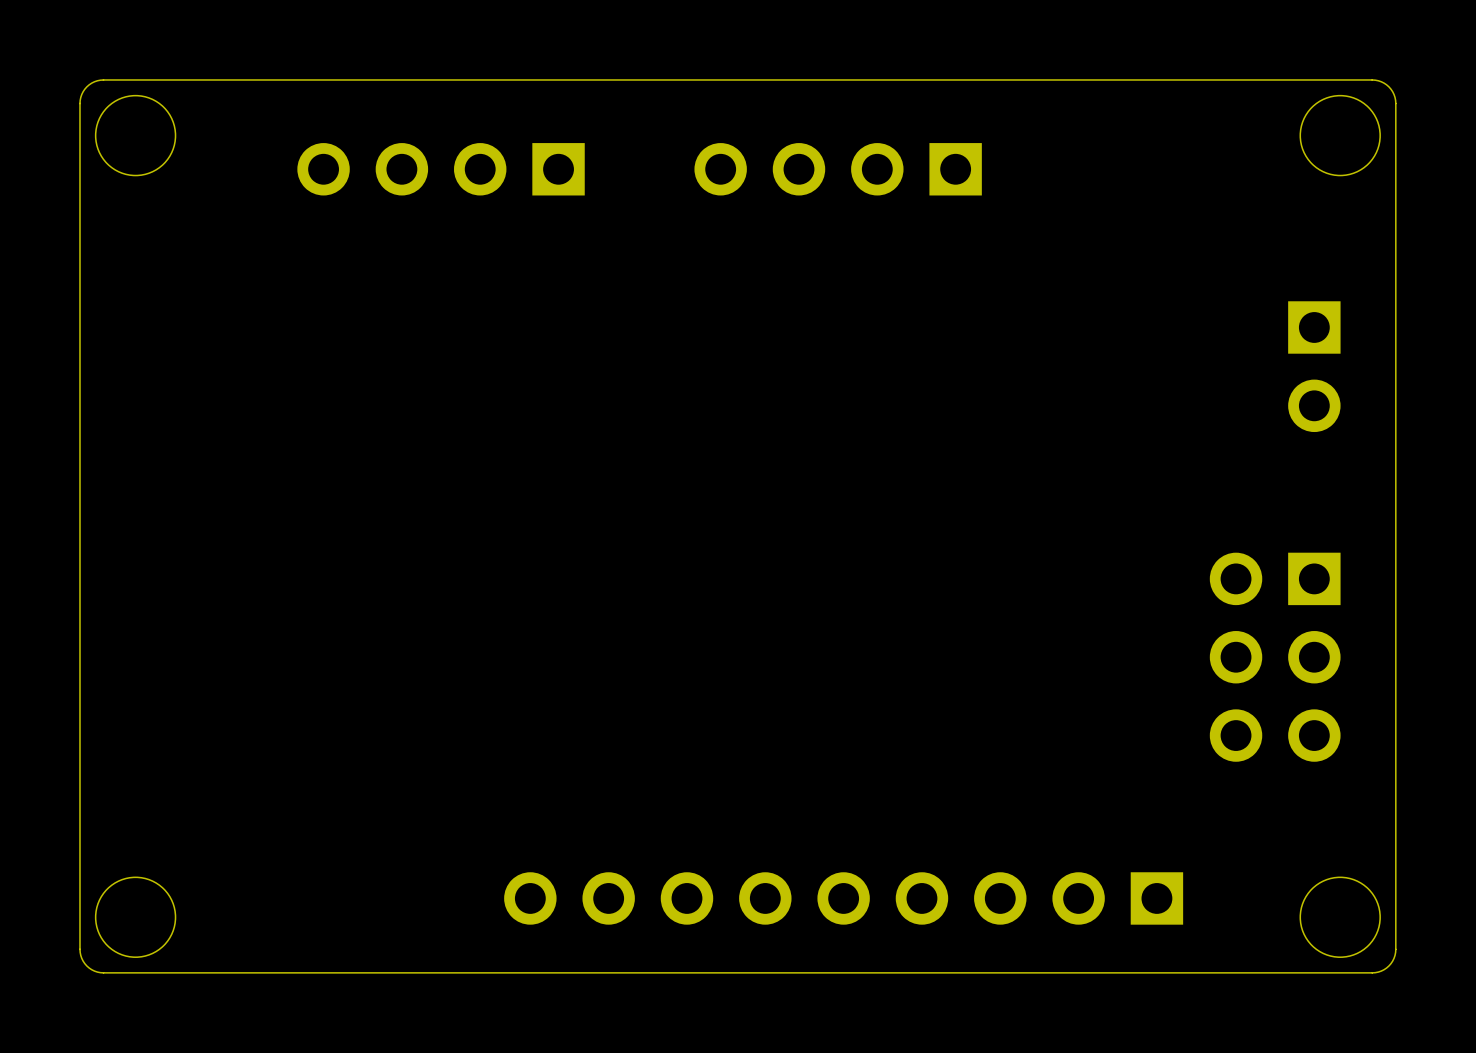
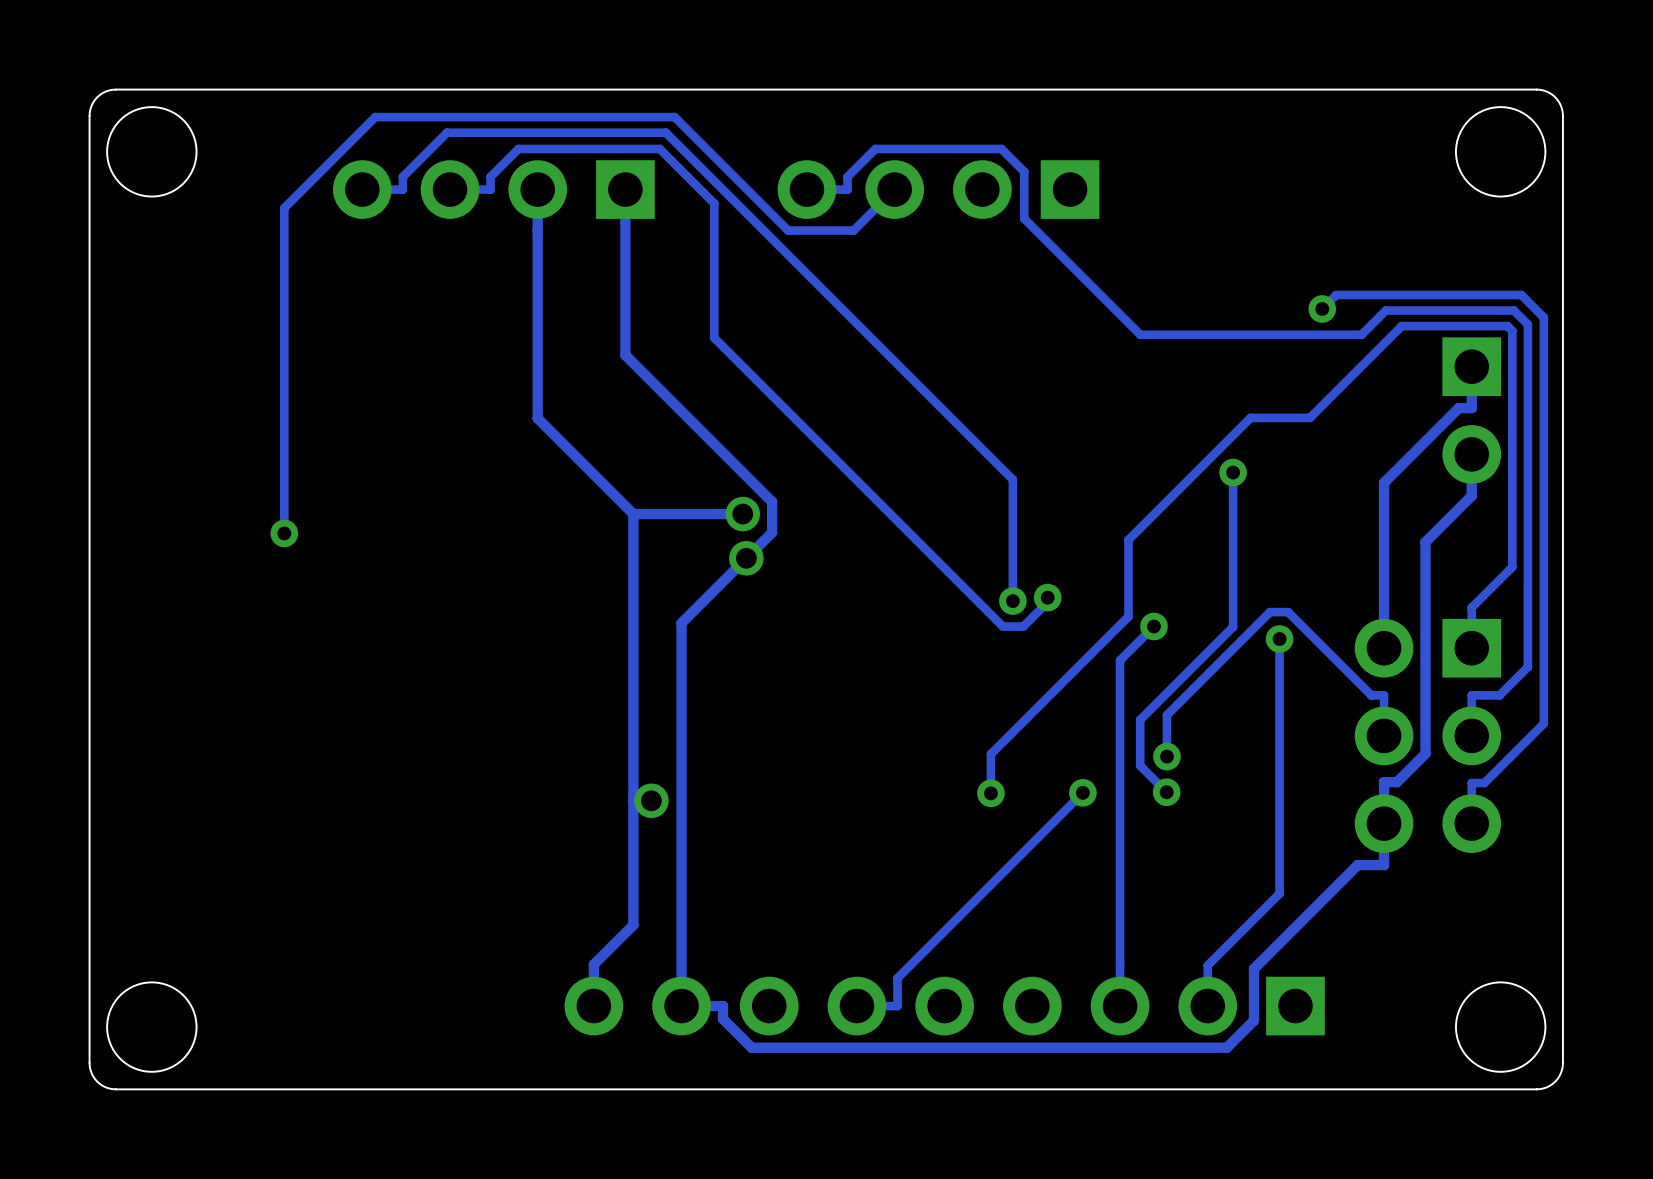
track: none -> (362, 189) (402, 189) (402, 176) (447, 132) (665, 132) (1012, 479) (1012, 601)
track: none -> (450, 189) (490, 189) (490, 176) (518, 148) (659, 148) (714, 203) (714, 337) (1002, 626) (1023, 626) (1047, 602) (1047, 597)
track: none -> (537, 189) (537, 418) (633, 514)
track: none -> (625, 189) (625, 355) (772, 501) (772, 532) (681, 623) (681, 1006) (722, 1006) (722, 1018) (751, 1047) (1226, 1047) (1254, 1020) (1254, 968) (1357, 865) (1384, 865) (1384, 782) (1396, 782) (1425, 753) (1425, 542) (1471, 495) (1471, 454)
track: none -> (806, 189) (847, 189) (847, 176) (875, 148) (1001, 148) (1024, 171) (1024, 218) (1140, 334) (1361, 334) (1385, 310) (1513, 310) (1527, 324) (1527, 667) (1499, 695) (1471, 695) (1471, 735)
track: none -> (894, 189) (853, 230) (788, 230) (674, 117) (375, 117) (284, 208) (284, 533)
track: none -> (1322, 308) (1336, 295) (1521, 295) (1543, 317) (1543, 723) (1484, 783) (1471, 783) (1471, 823)
via: none -> (1322, 308)
track: none -> (1471, 366) (1471, 408) (1458, 408) (1384, 482) (1384, 648)
track: none -> (1233, 472) (1233, 627) (1140, 719) (1140, 765) (1166, 792)
via: none -> (1233, 472)
track: none -> (633, 514) (633, 925) (593, 964) (593, 1006)
track: none -> (742, 514) (633, 514)
via: none -> (742, 514)
via: none -> (284, 533)
via: none -> (746, 558)
via: none -> (1047, 597)
via: none -> (1012, 601)
track: none -> (1153, 626) (1120, 660) (1120, 1006)
via: none -> (1153, 626)
track: none -> (1279, 639) (1279, 893) (1207, 965) (1207, 1006)
via: none -> (1279, 639)
track: none -> (1471, 648) (1471, 607) (1512, 567) (1512, 330) (1507, 326) (1401, 326) (1309, 417) (1250, 417) (1128, 539) (1128, 616) (990, 754) (990, 793)
track: none -> (1384, 735) (1384, 695) (1371, 695) (1288, 612) (1269, 612) (1166, 715) (1166, 756)
via: none -> (1166, 756)
via: none -> (1166, 792)
via: none -> (990, 793)
track: none -> (1082, 792) (897, 978) (897, 1006) (856, 1006)
via: none -> (1082, 792)
via: none -> (651, 800)

